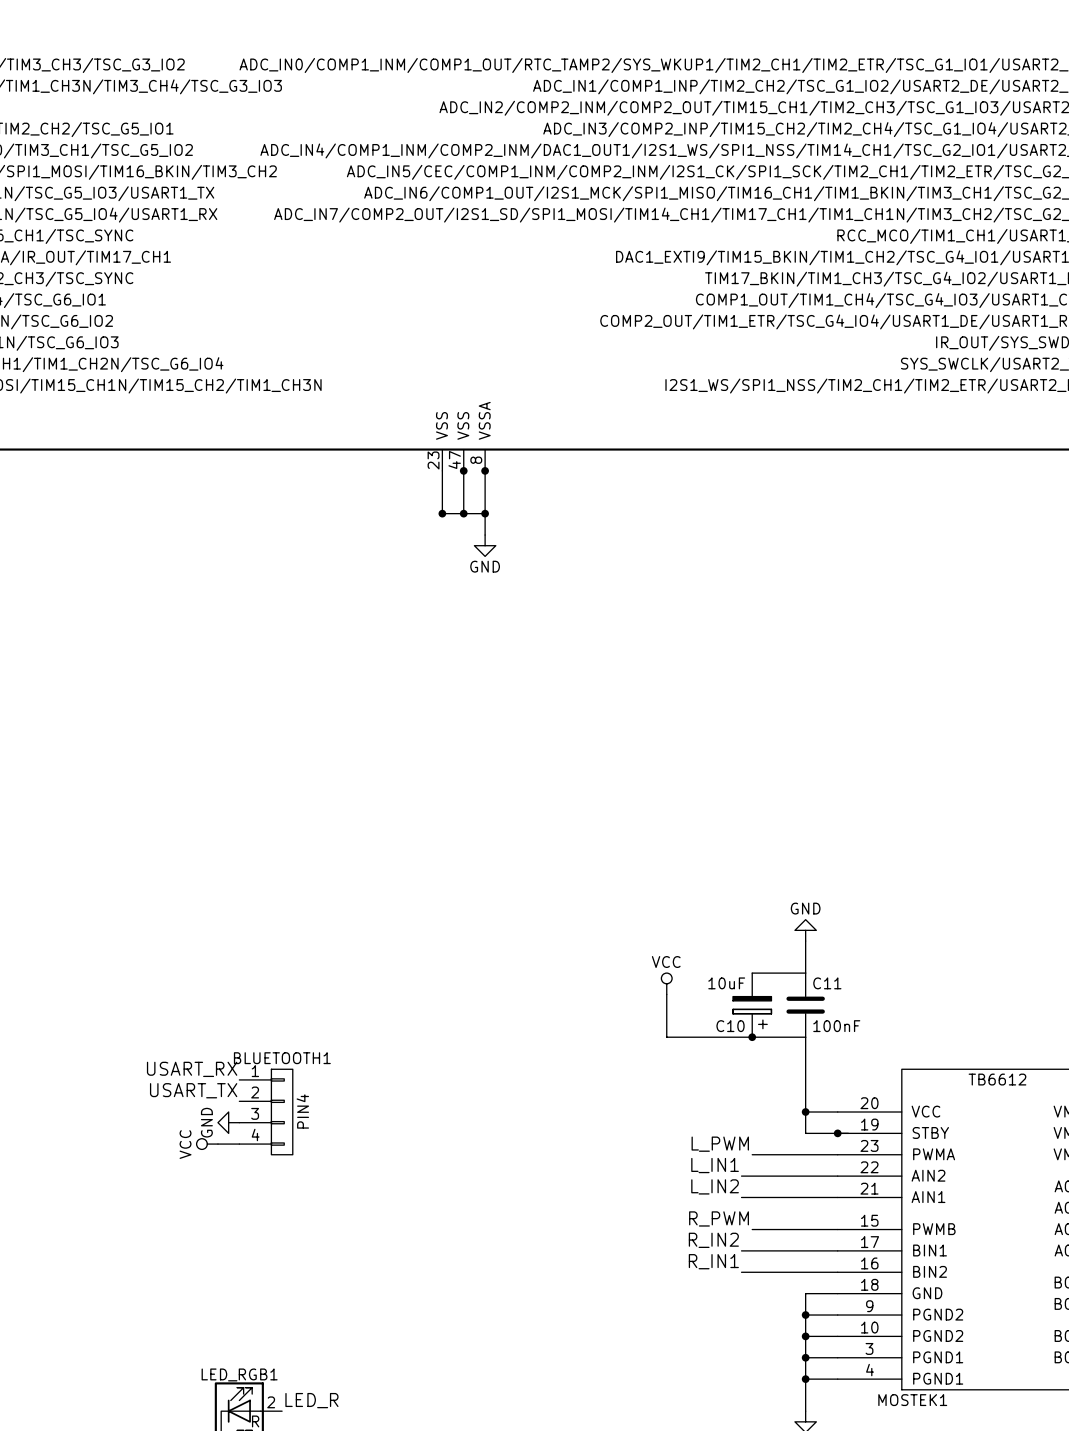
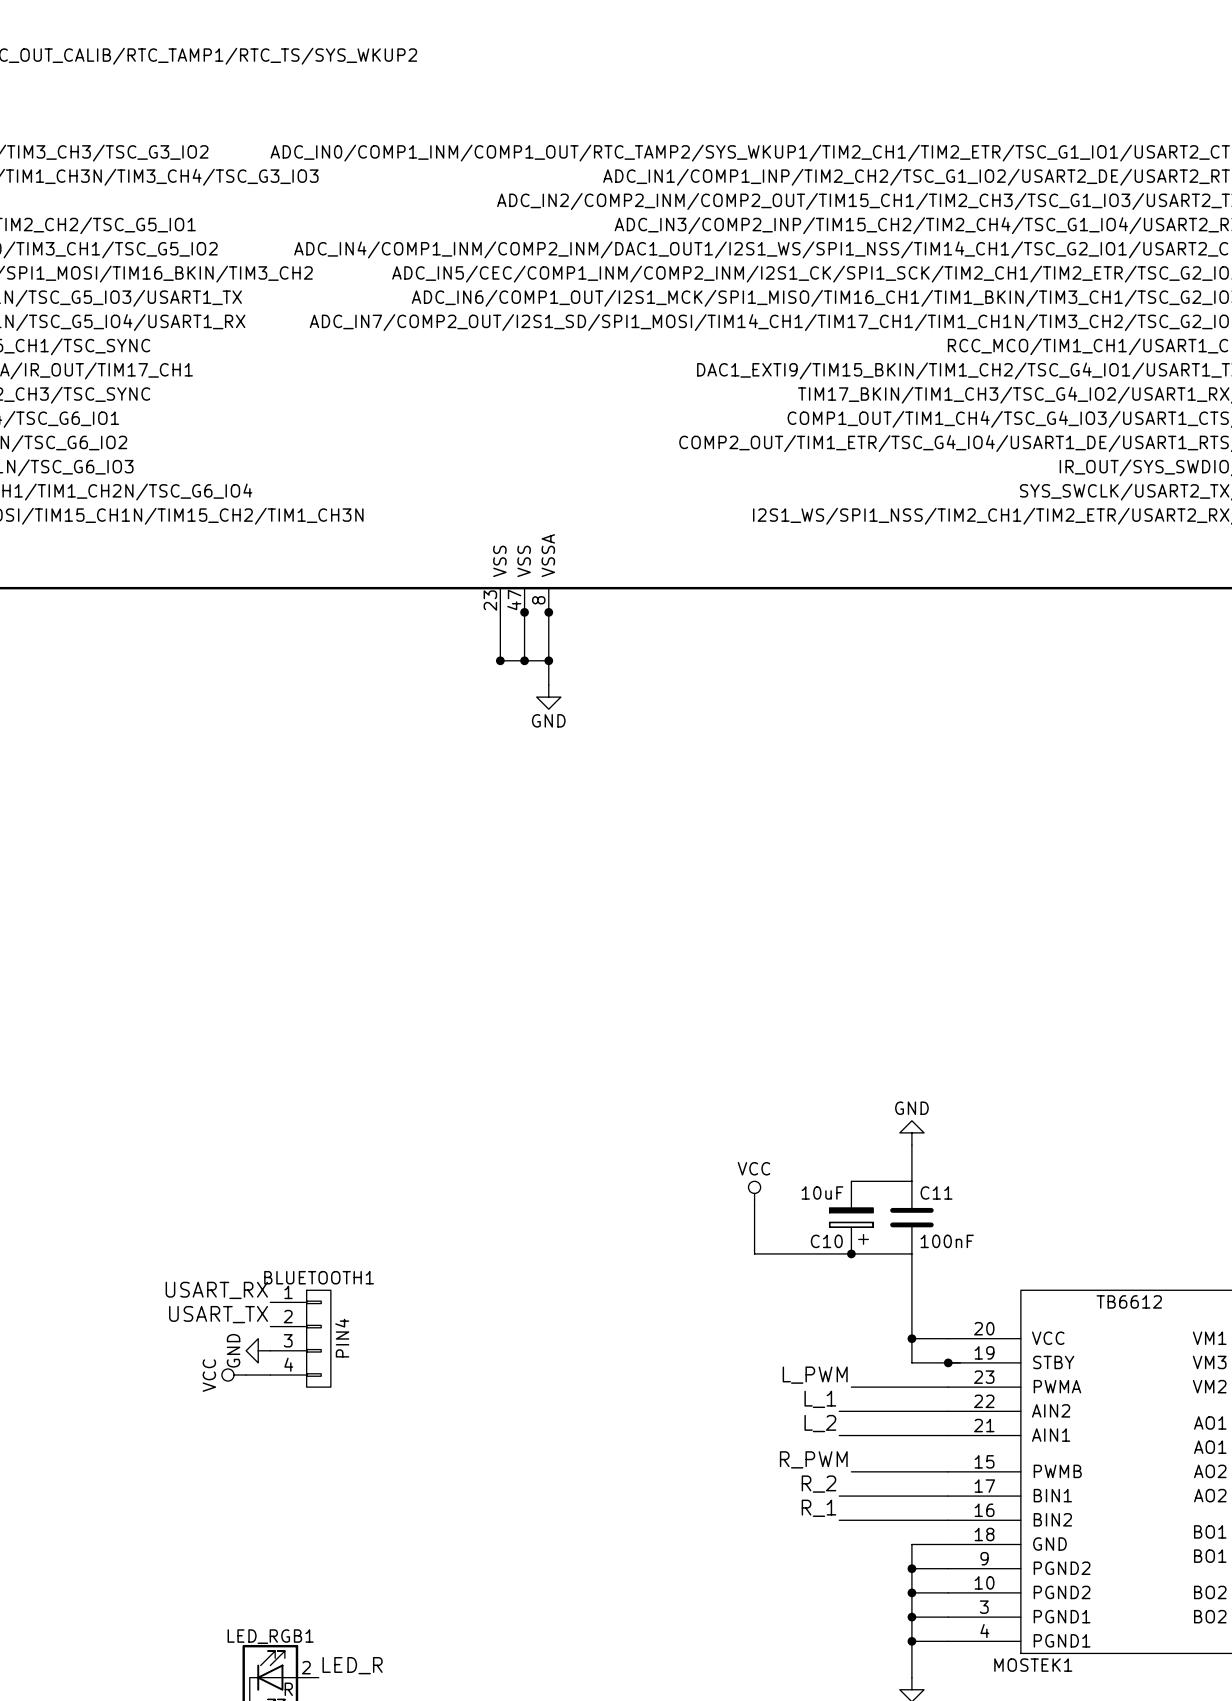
label: L_IN1 (715, 1165) -> L_1 (820, 1399)
label: L_IN2 (715, 1186) -> L_2 (820, 1423)
label: R_IN2 (713, 1240) -> R_2 (818, 1484)
label: R_IN1 (713, 1261) -> R_1 (818, 1508)

